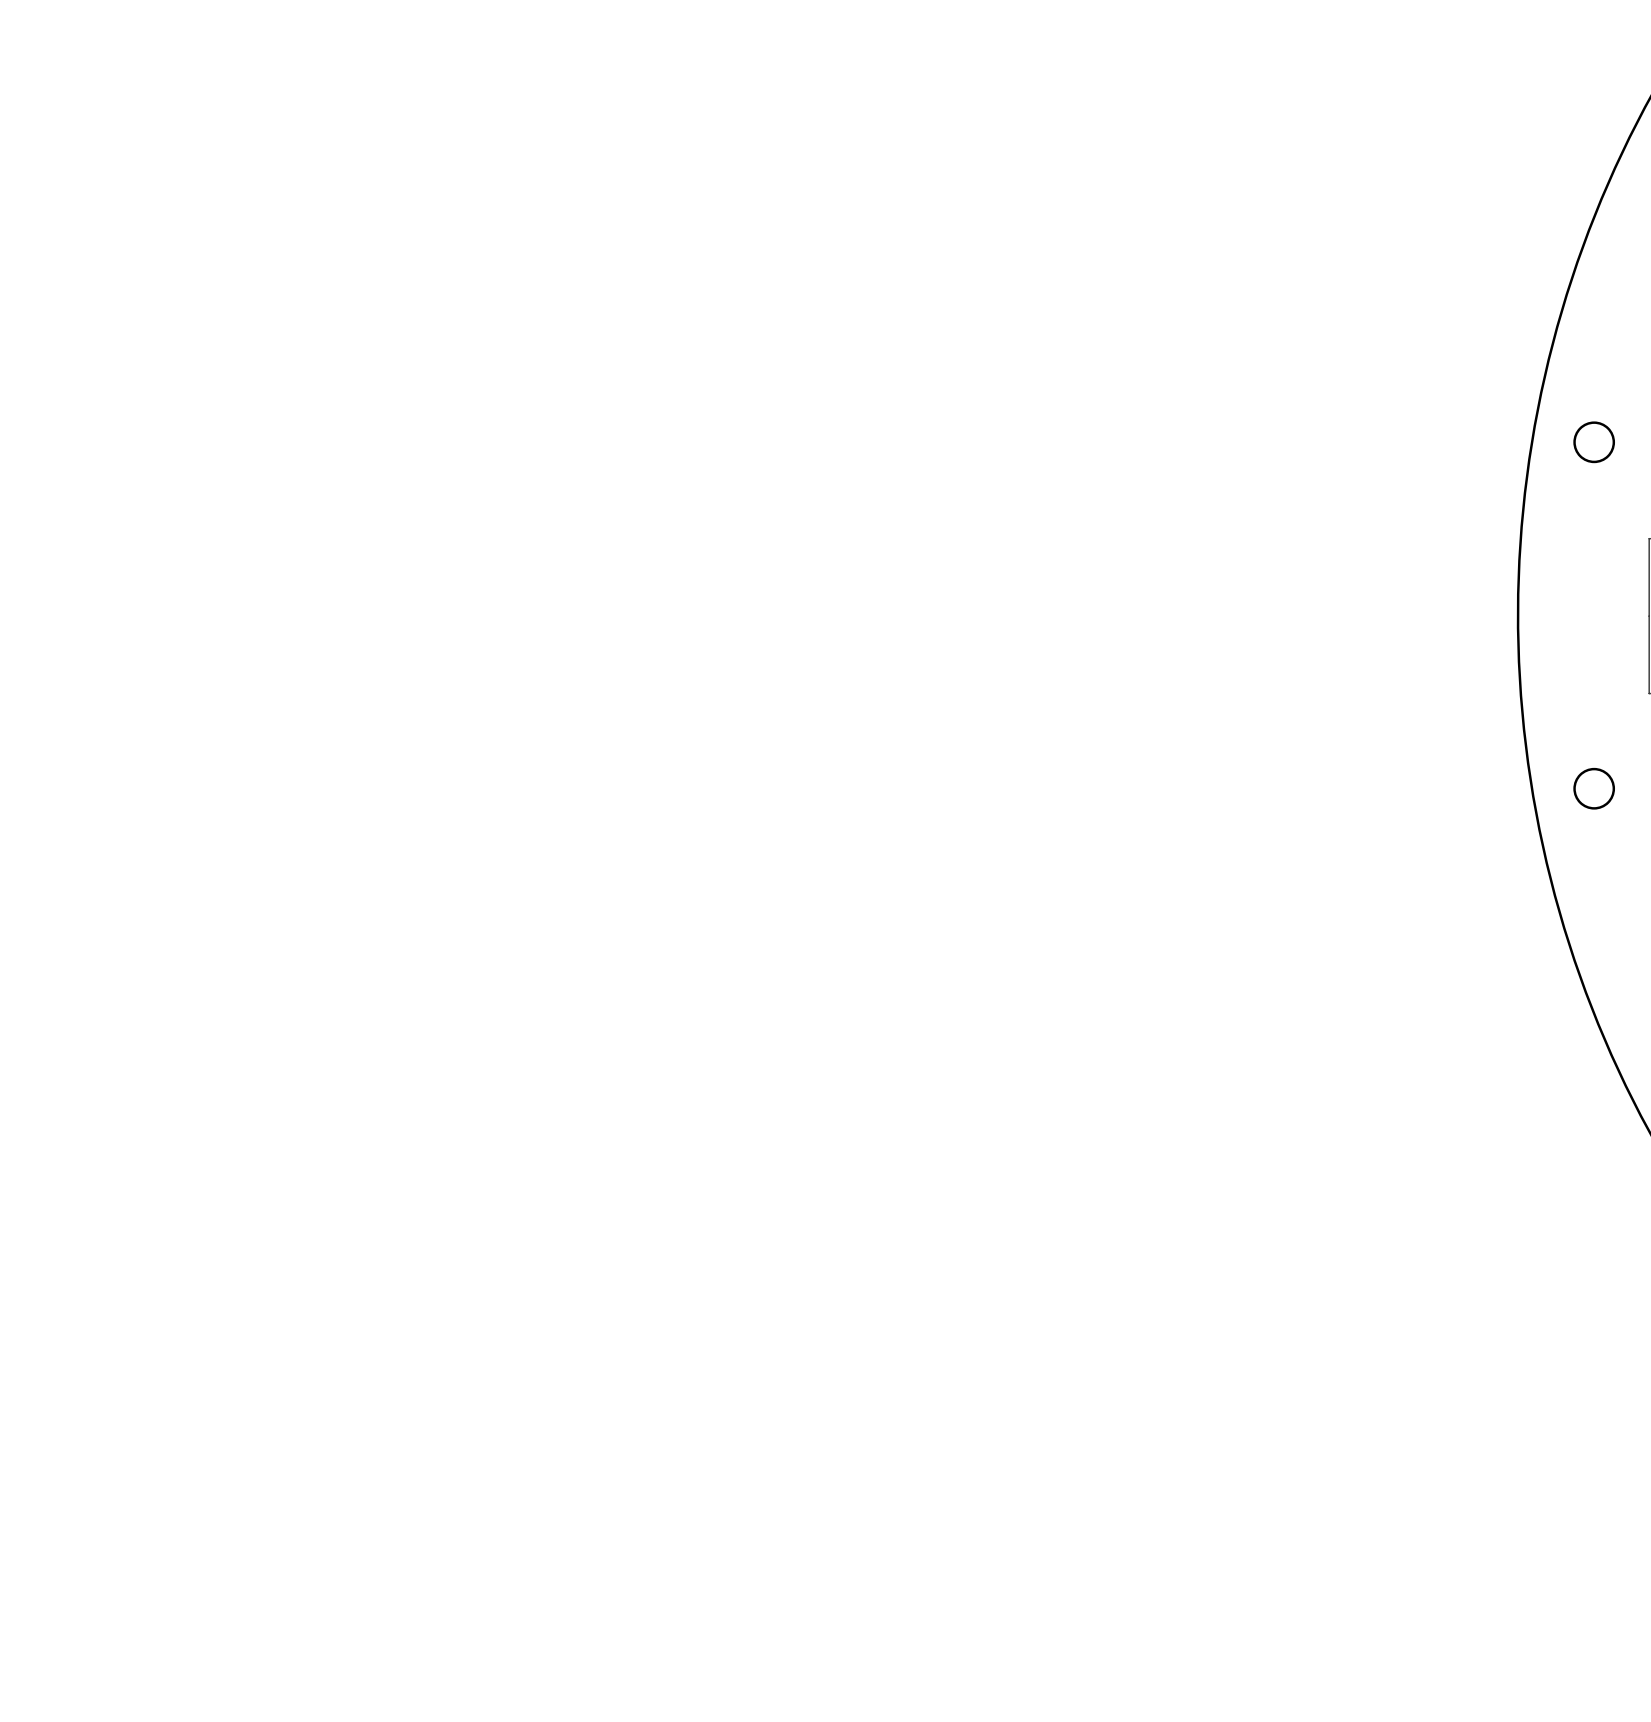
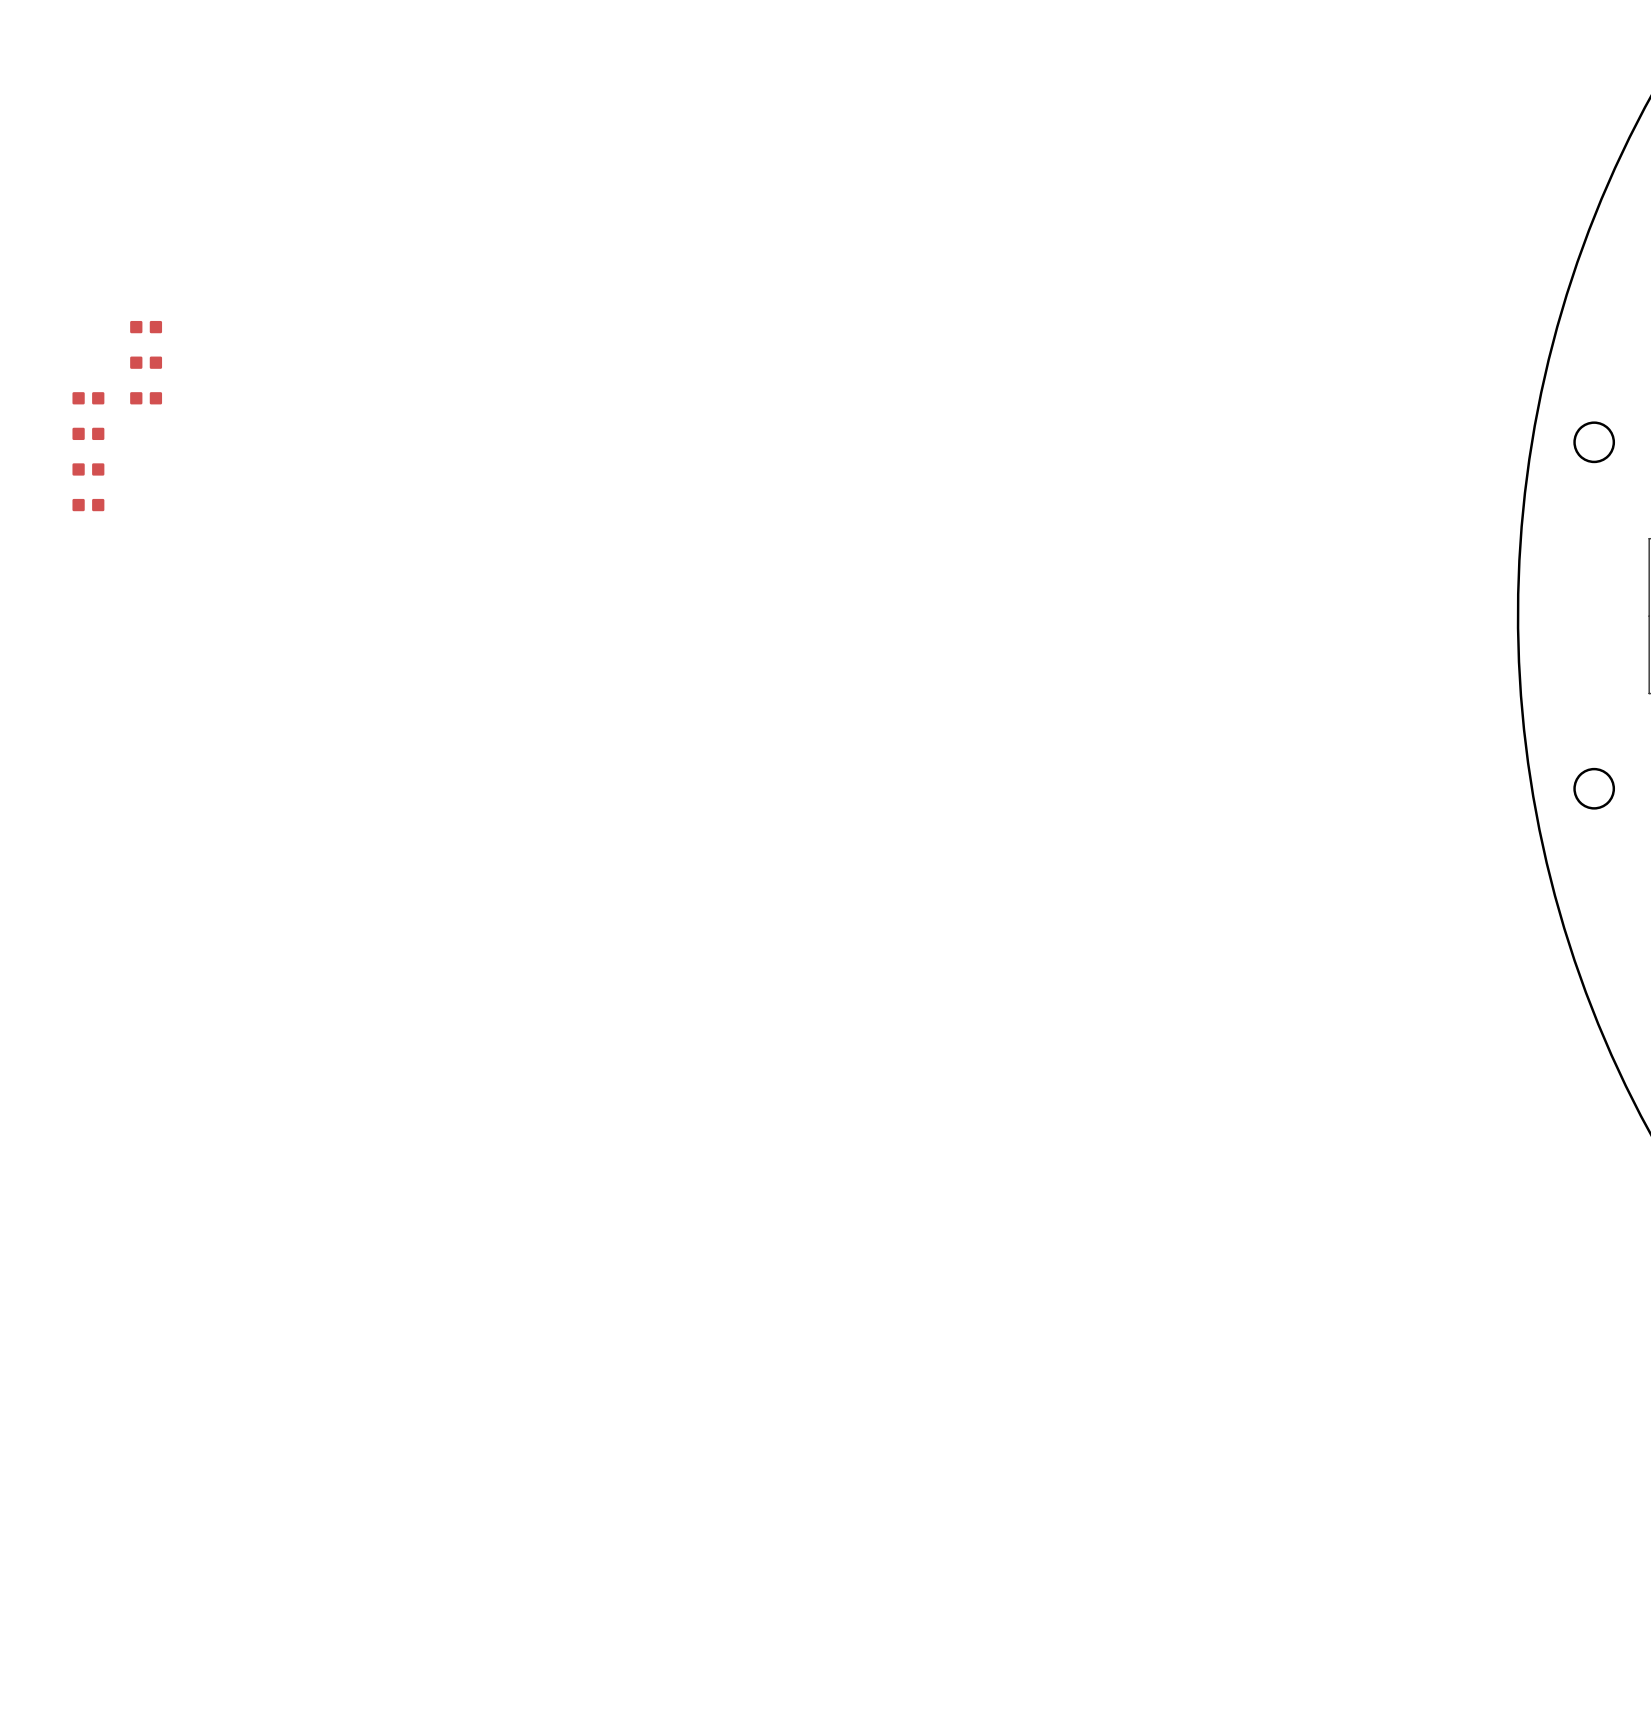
part: none -> (146, 327)
part: none -> (146, 362)
part: none -> (88, 398)
part: none -> (146, 398)
part: none -> (88, 433)
part: none -> (88, 469)
part: none -> (88, 505)

